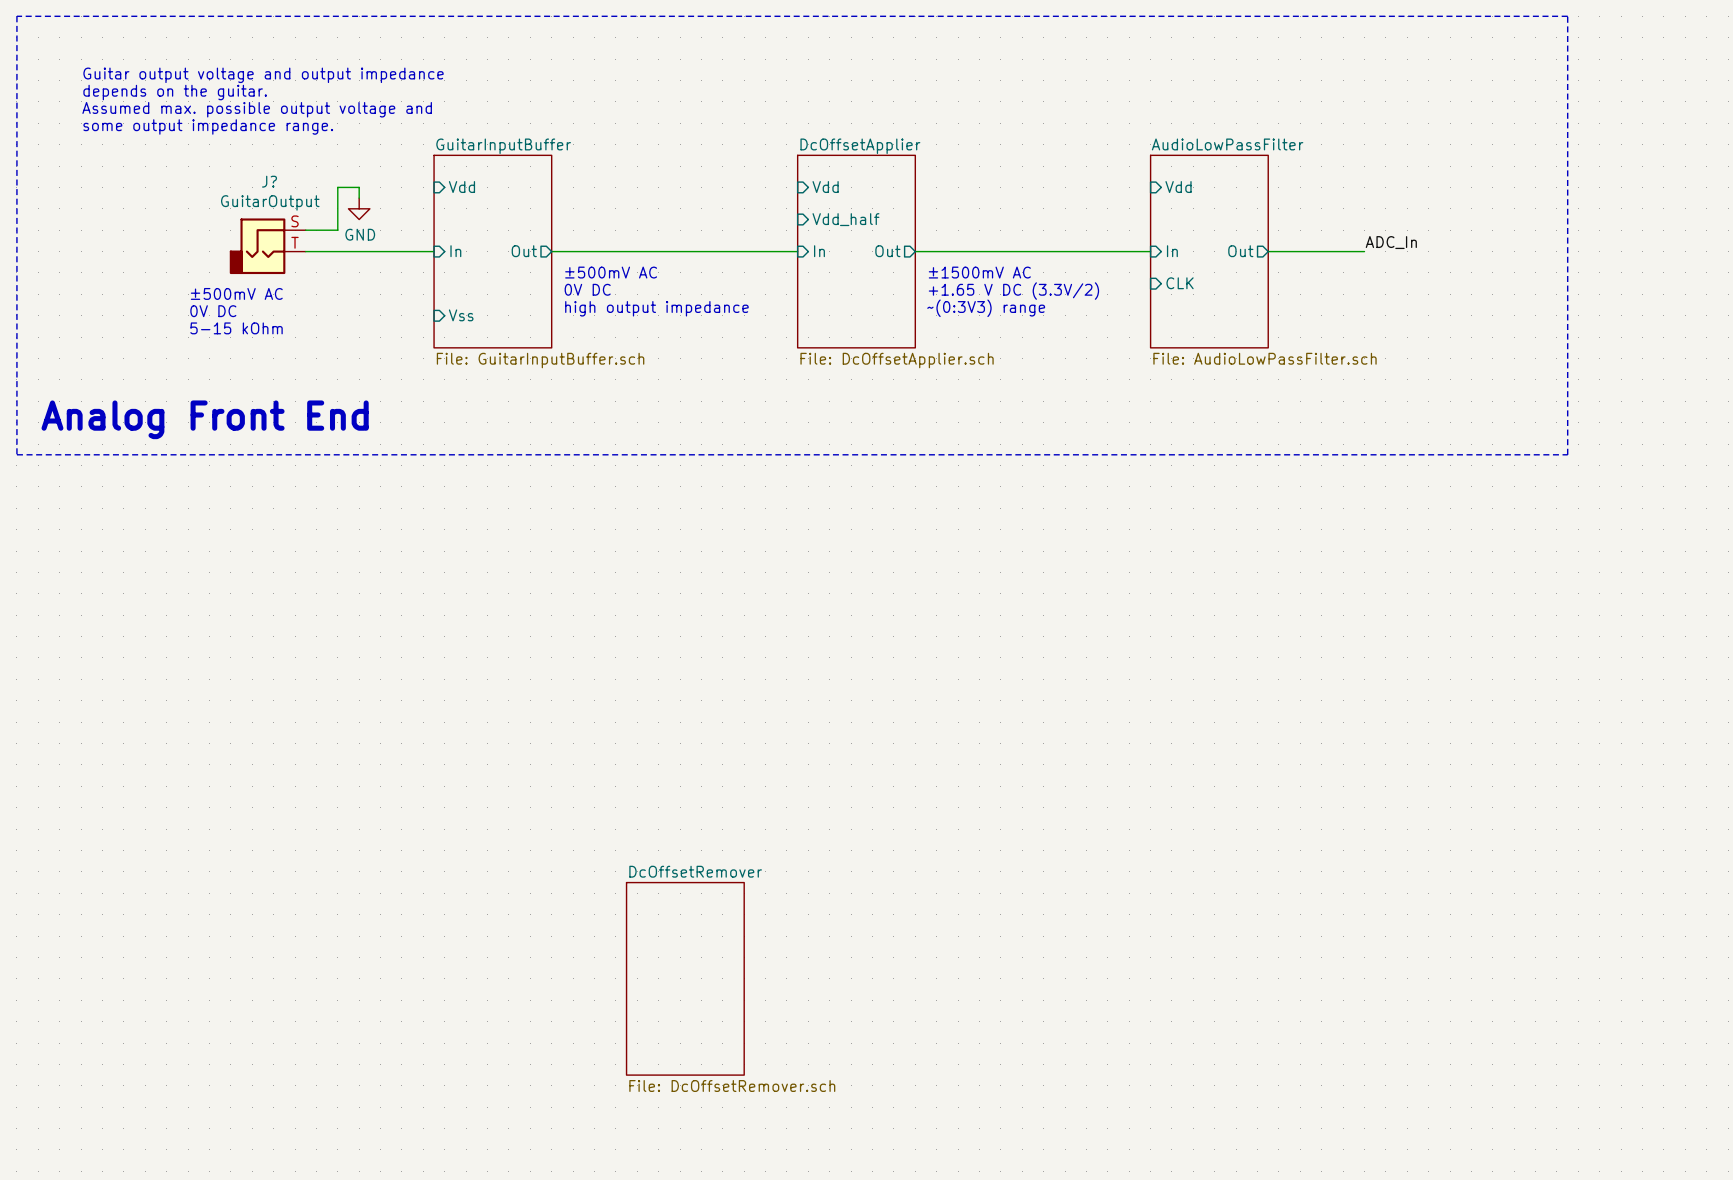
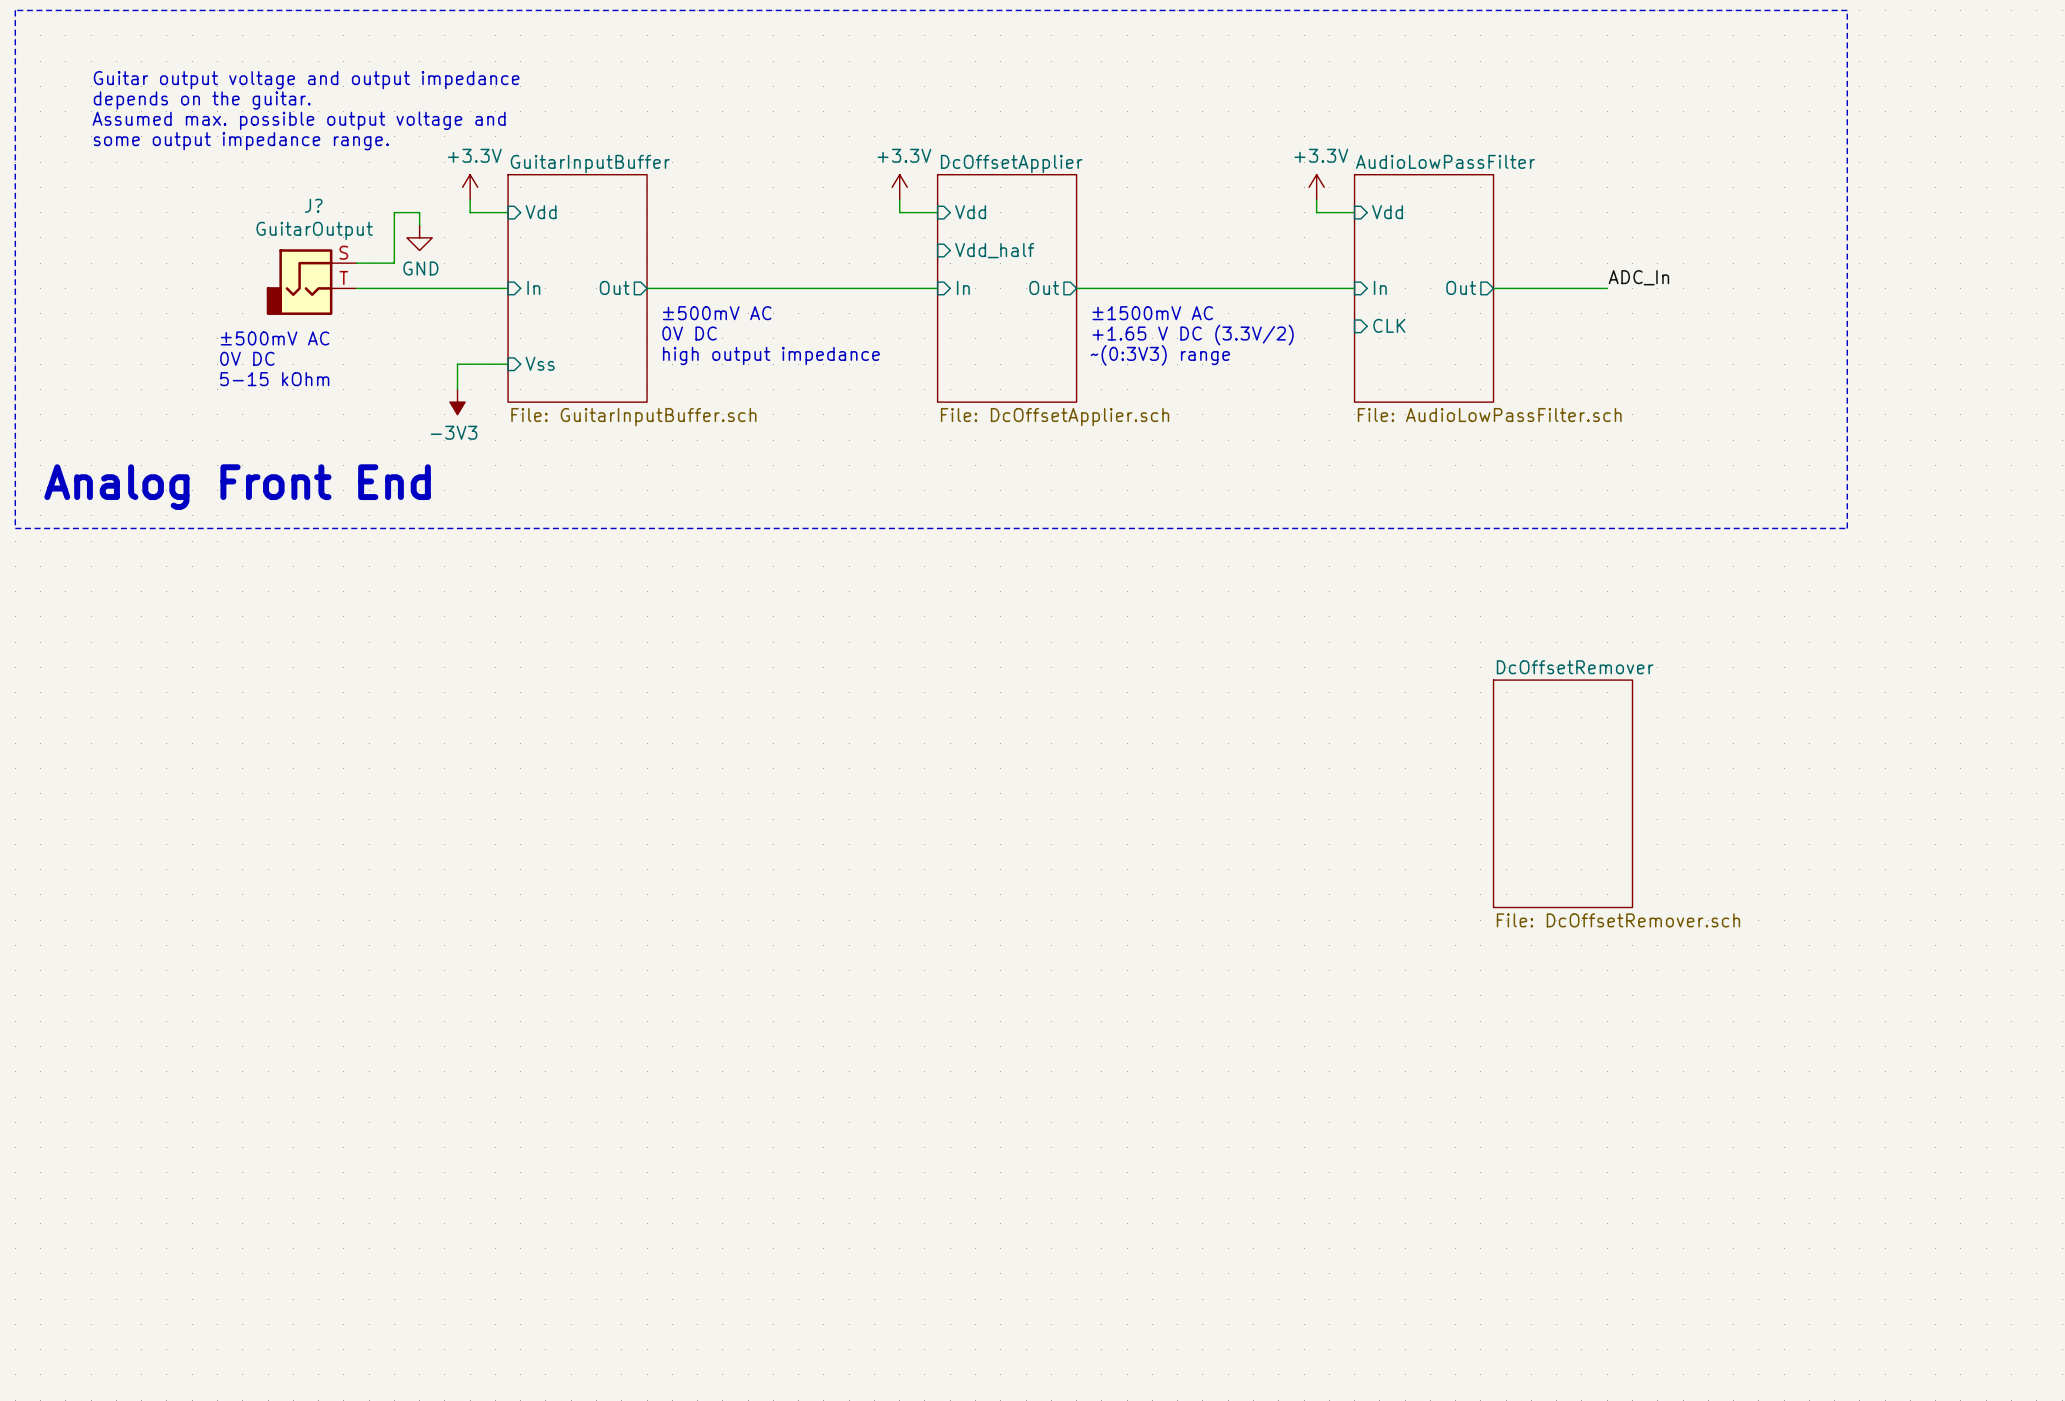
power symbol: none -> +3.3V (470, 187)
power symbol: none -> +3.3V (899, 187)
power symbol: none -> +3.3V (1316, 187)
wire: none -> (470, 199) (470, 212) (508, 212)
wire: none -> (899, 199) (899, 212) (937, 212)
wire: none -> (1316, 199) (1316, 212) (1354, 212)
wire: none -> (508, 364) (457, 364) (457, 389)
power symbol: none -> -3V3 (457, 402)
sheet DcOffsetRemover: none -> File: DcOffsetRemover.sch (1563, 793)
sheet DcOffsetRemover: File: DcOffsetRemover.sch (685, 978) -> none

